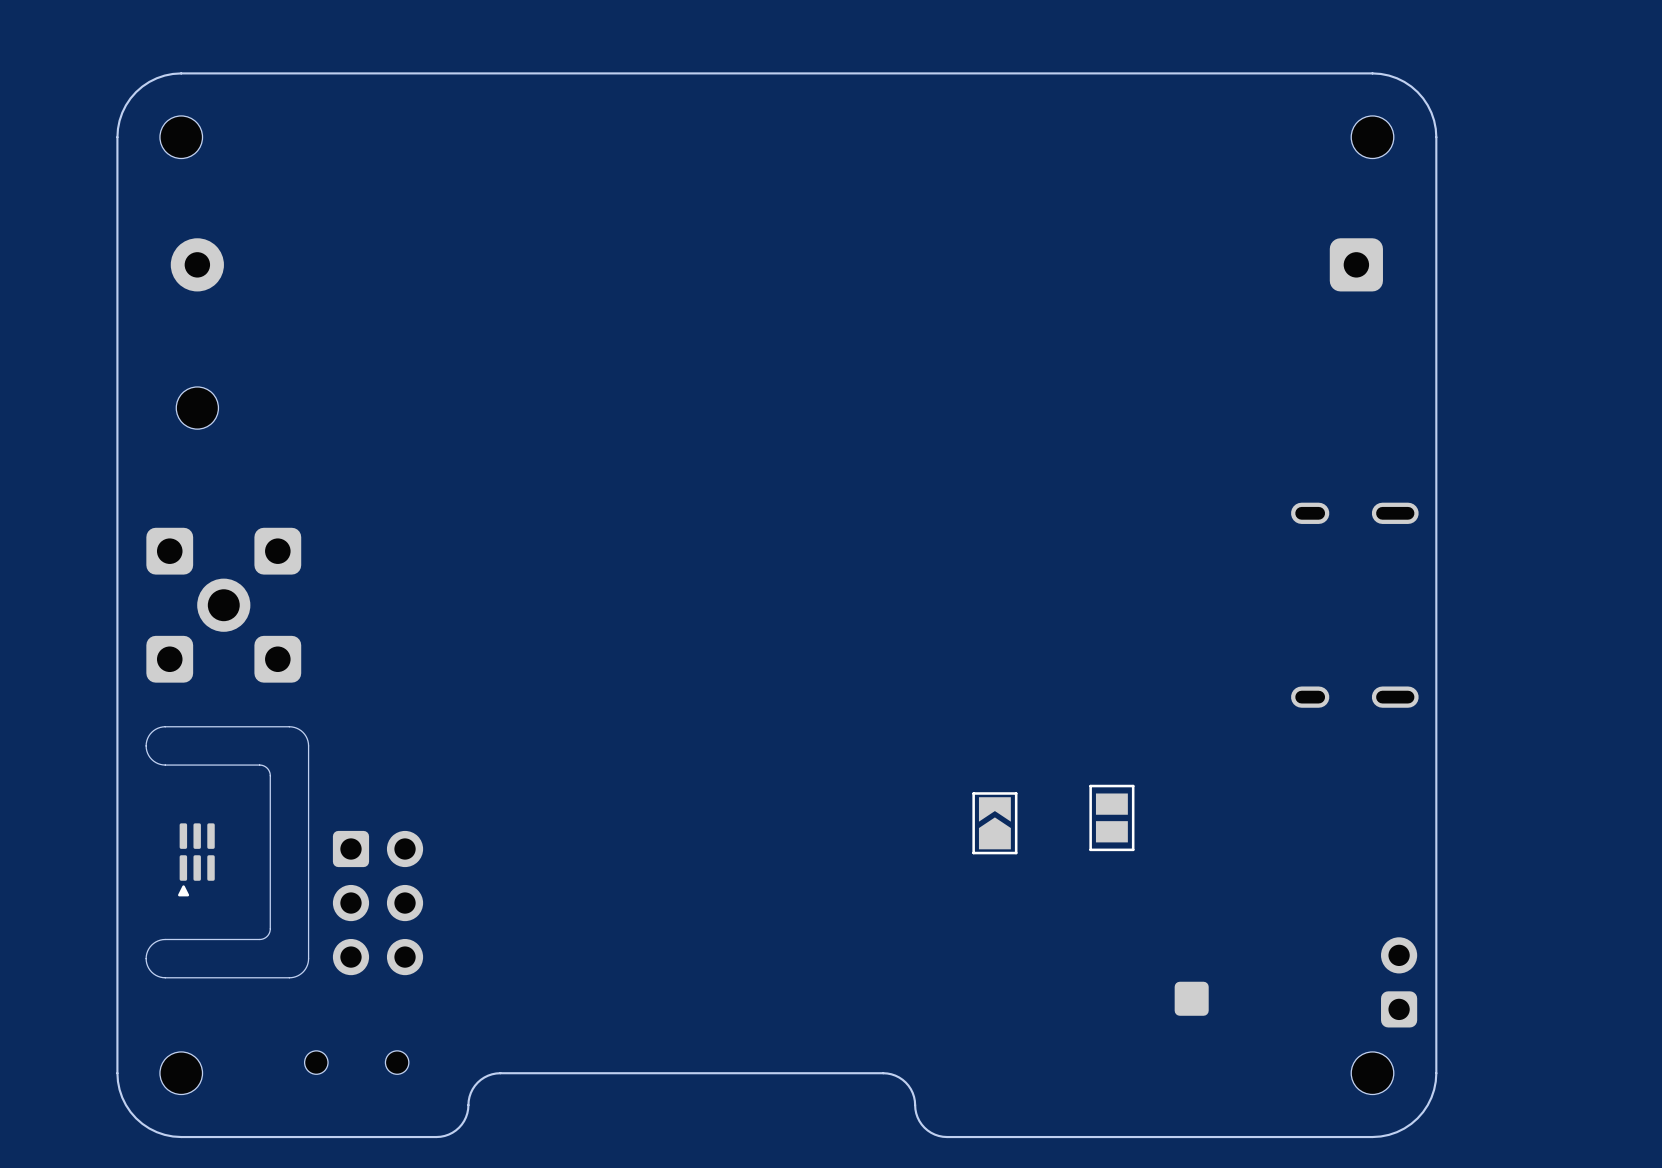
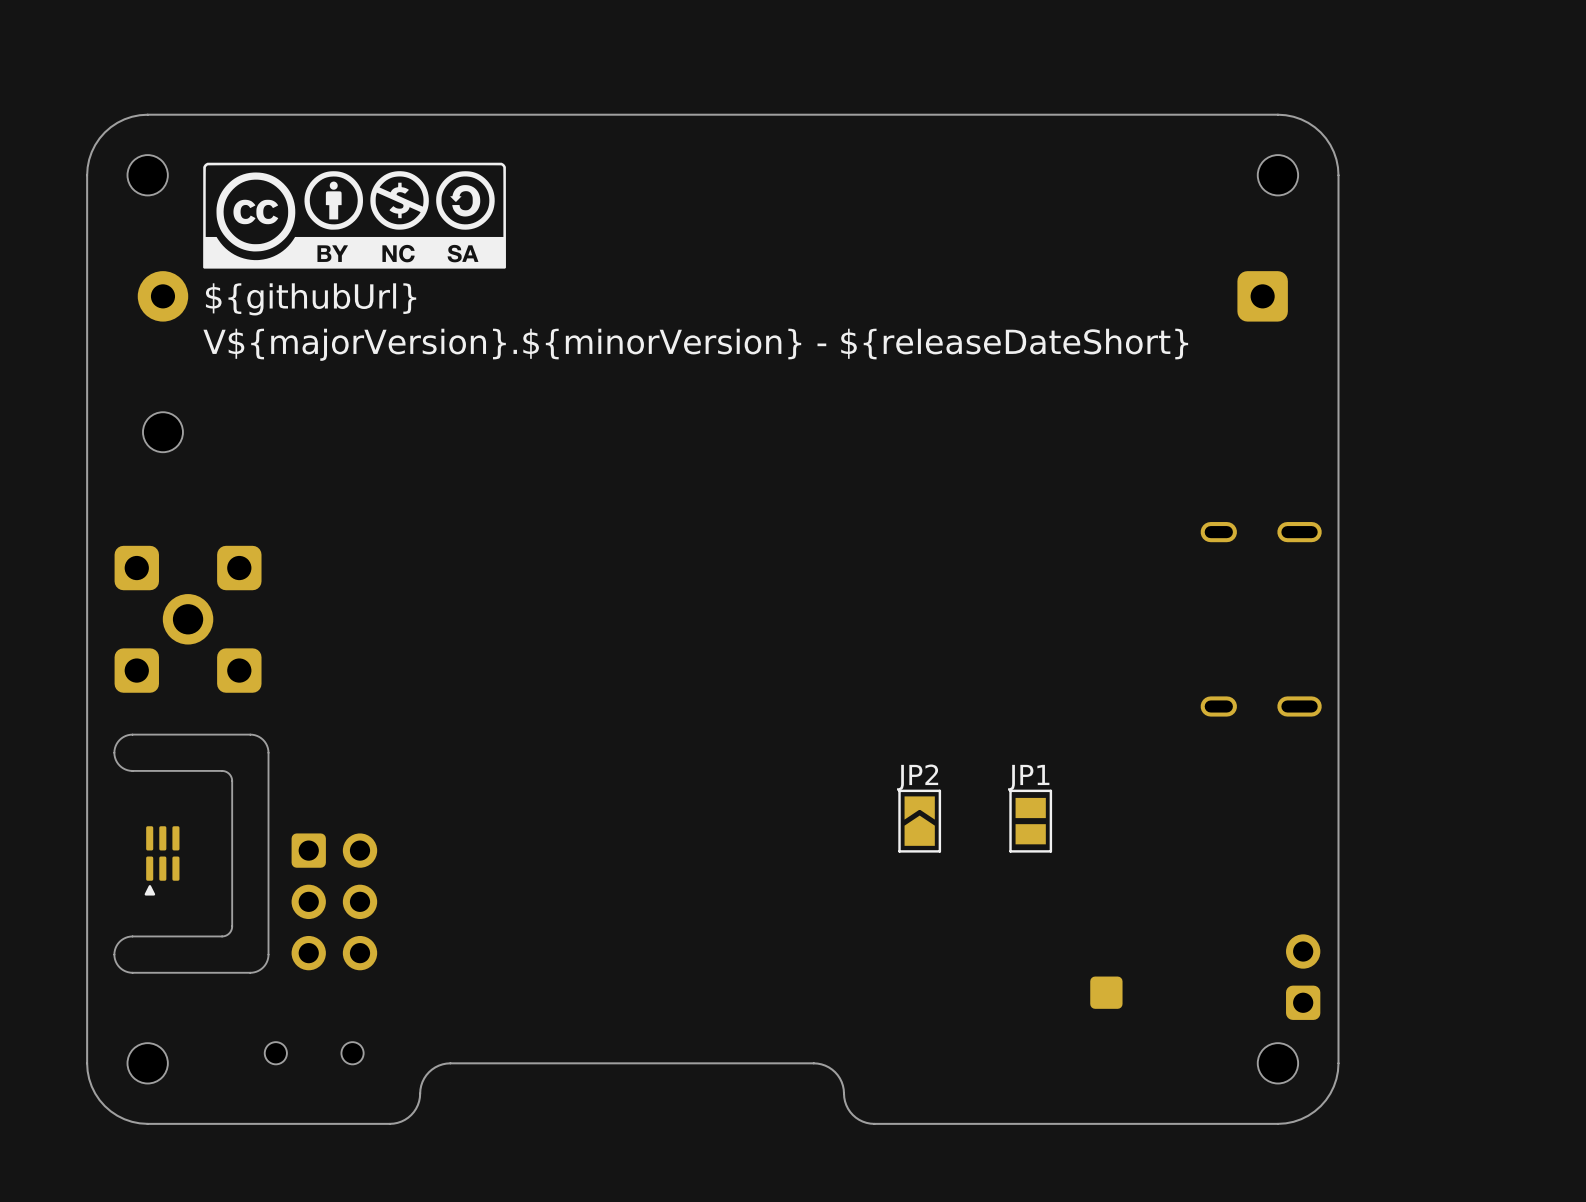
drawing: none -> [203, 162, 506, 269]
text: none -> ${githubUrl} (311, 299)
text: none -> V${majorVersion}.${minorVersion} - ${releaseDateShort} (695, 344)
JP1 name: none -> JP1 (1028, 777)
JP2: none -> (919, 821)
part: (994, 823) -> none

